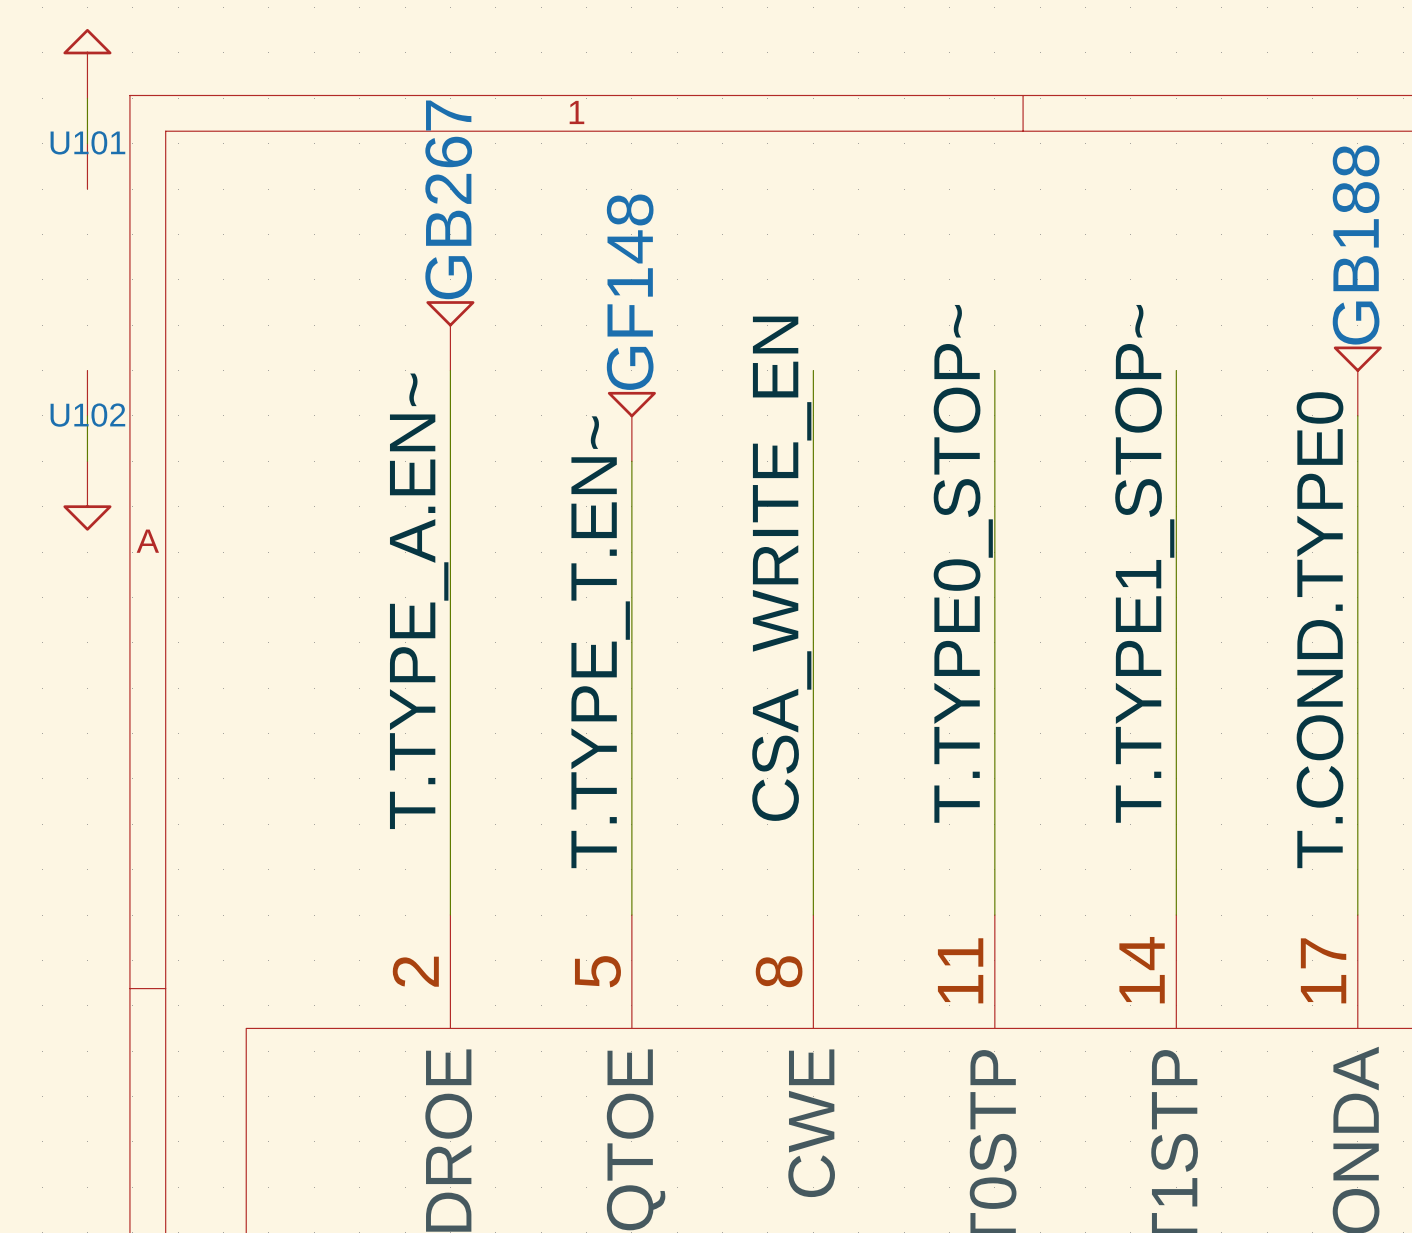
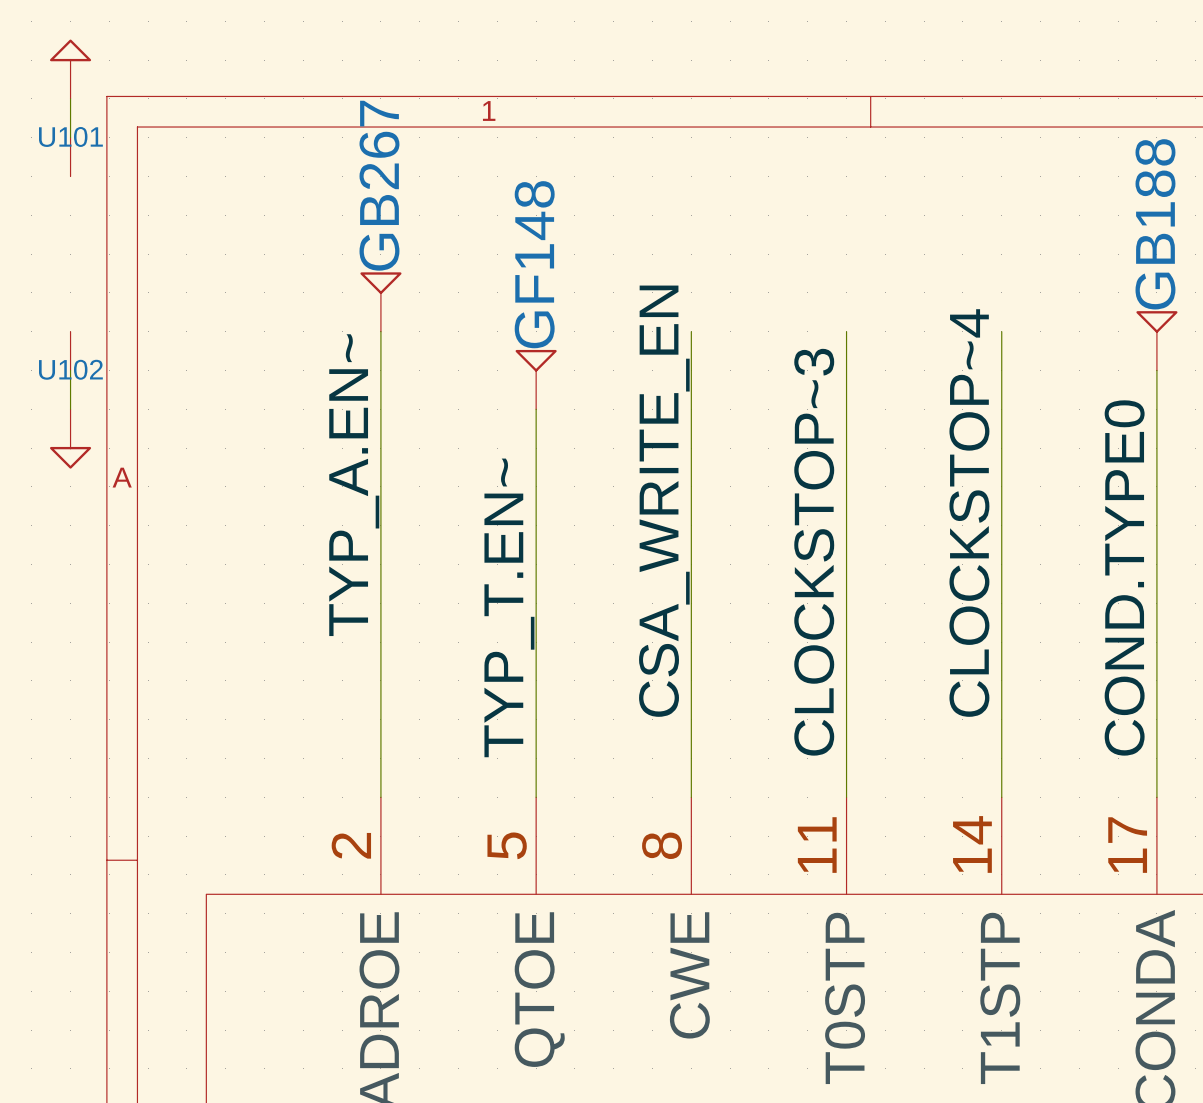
label: T.TYPE0_STOP~ (963, 563) -> none
label: T.TYPE1_STOP~ (1144, 563) -> CLOCKSTOP~4 (969, 513)
label: T.TYPE_A.EN~ (419, 601) -> TYP_A.EN~ (354, 485)
label: none -> CLOCKSTOP~3 (814, 552)
label: T.COND.TYPE0 (1320, 630) -> COND.TYPE0 (1124, 577)
label: T.TYPE_T.EN~ (600, 642) -> TYP_T.EN~ (509, 607)

